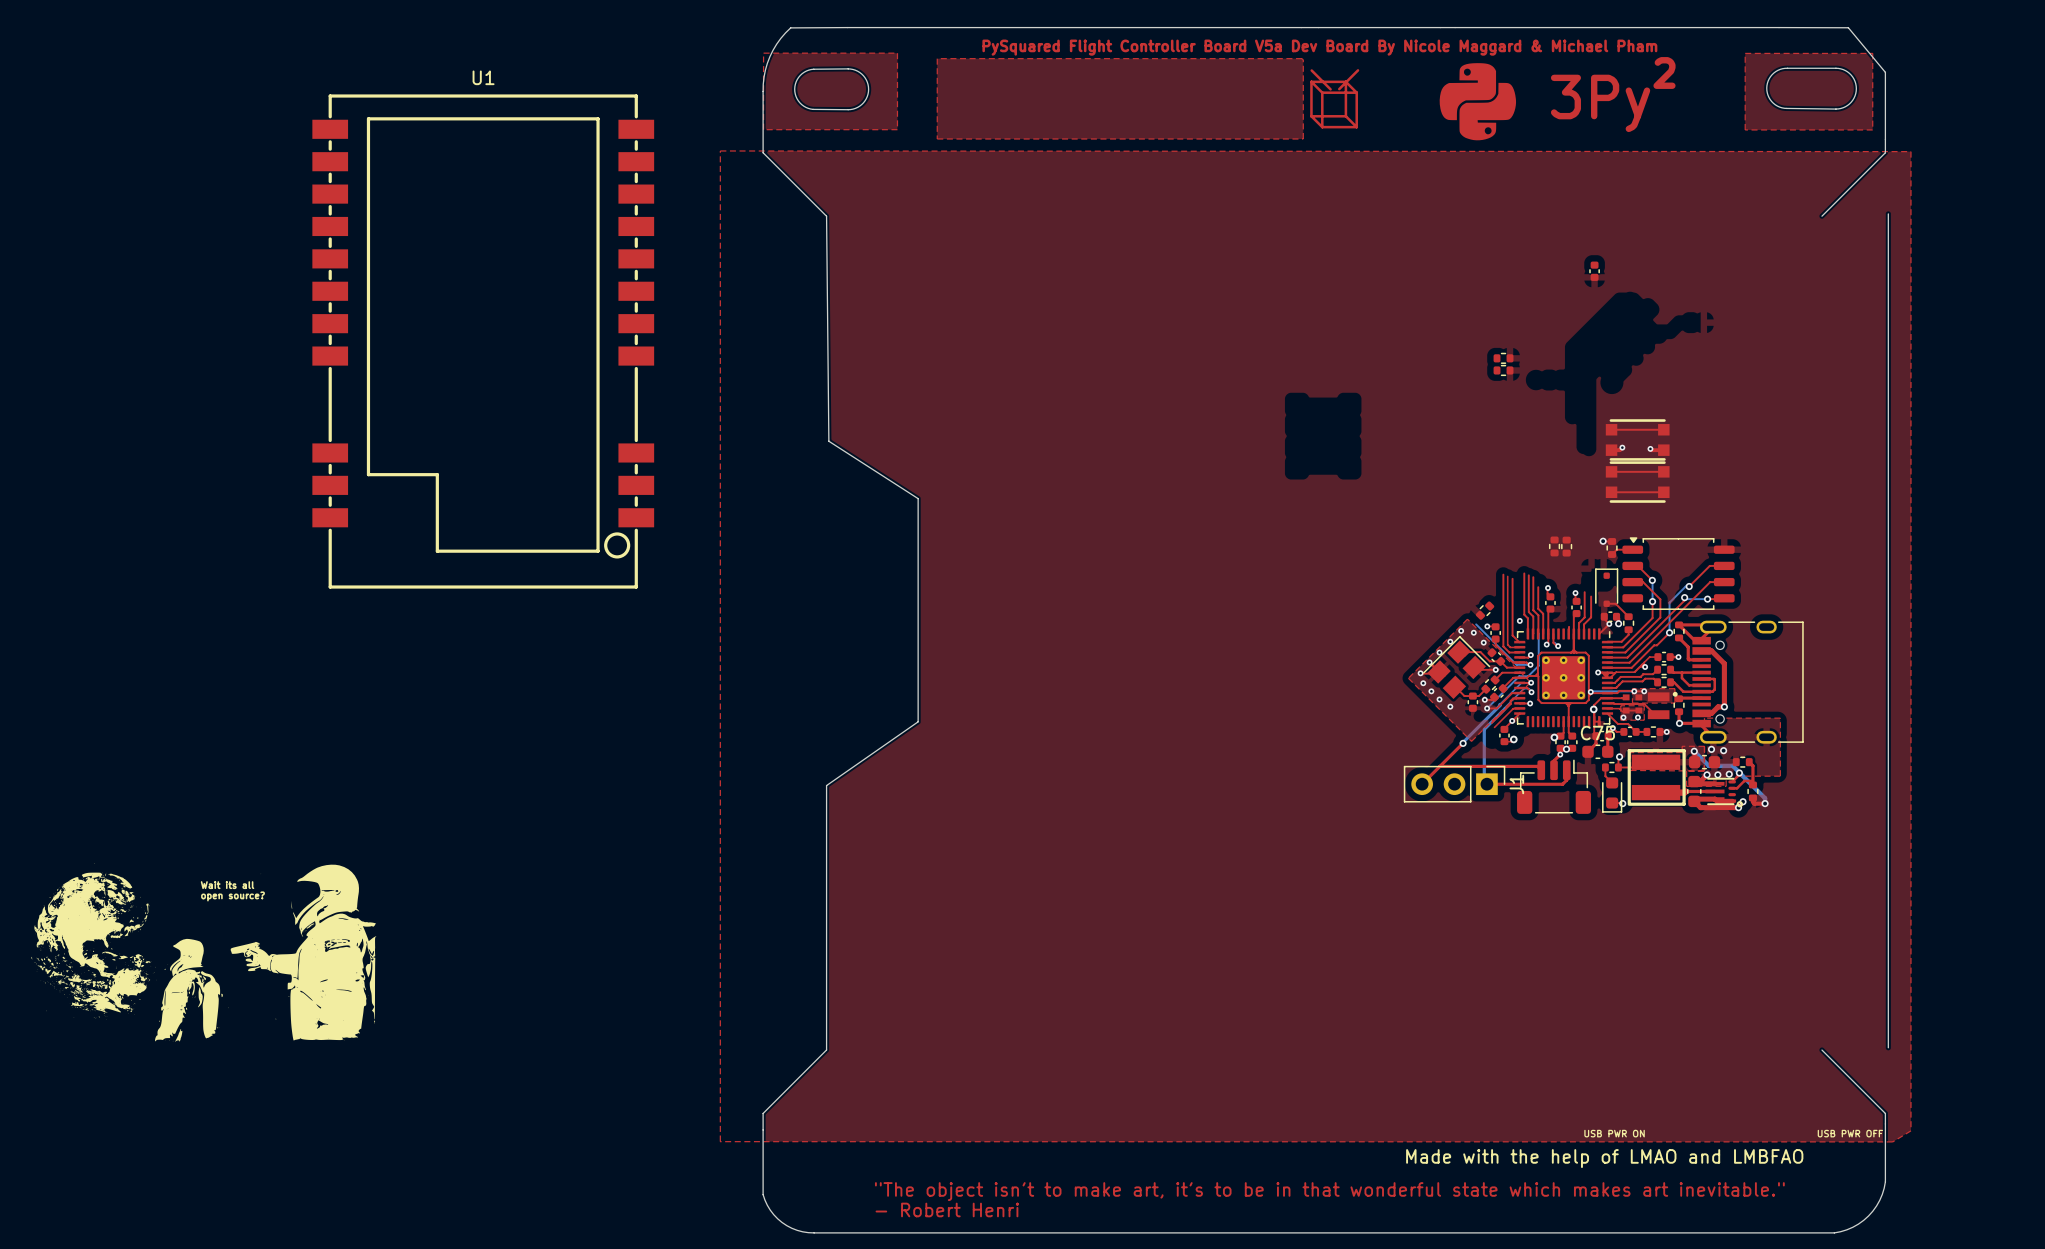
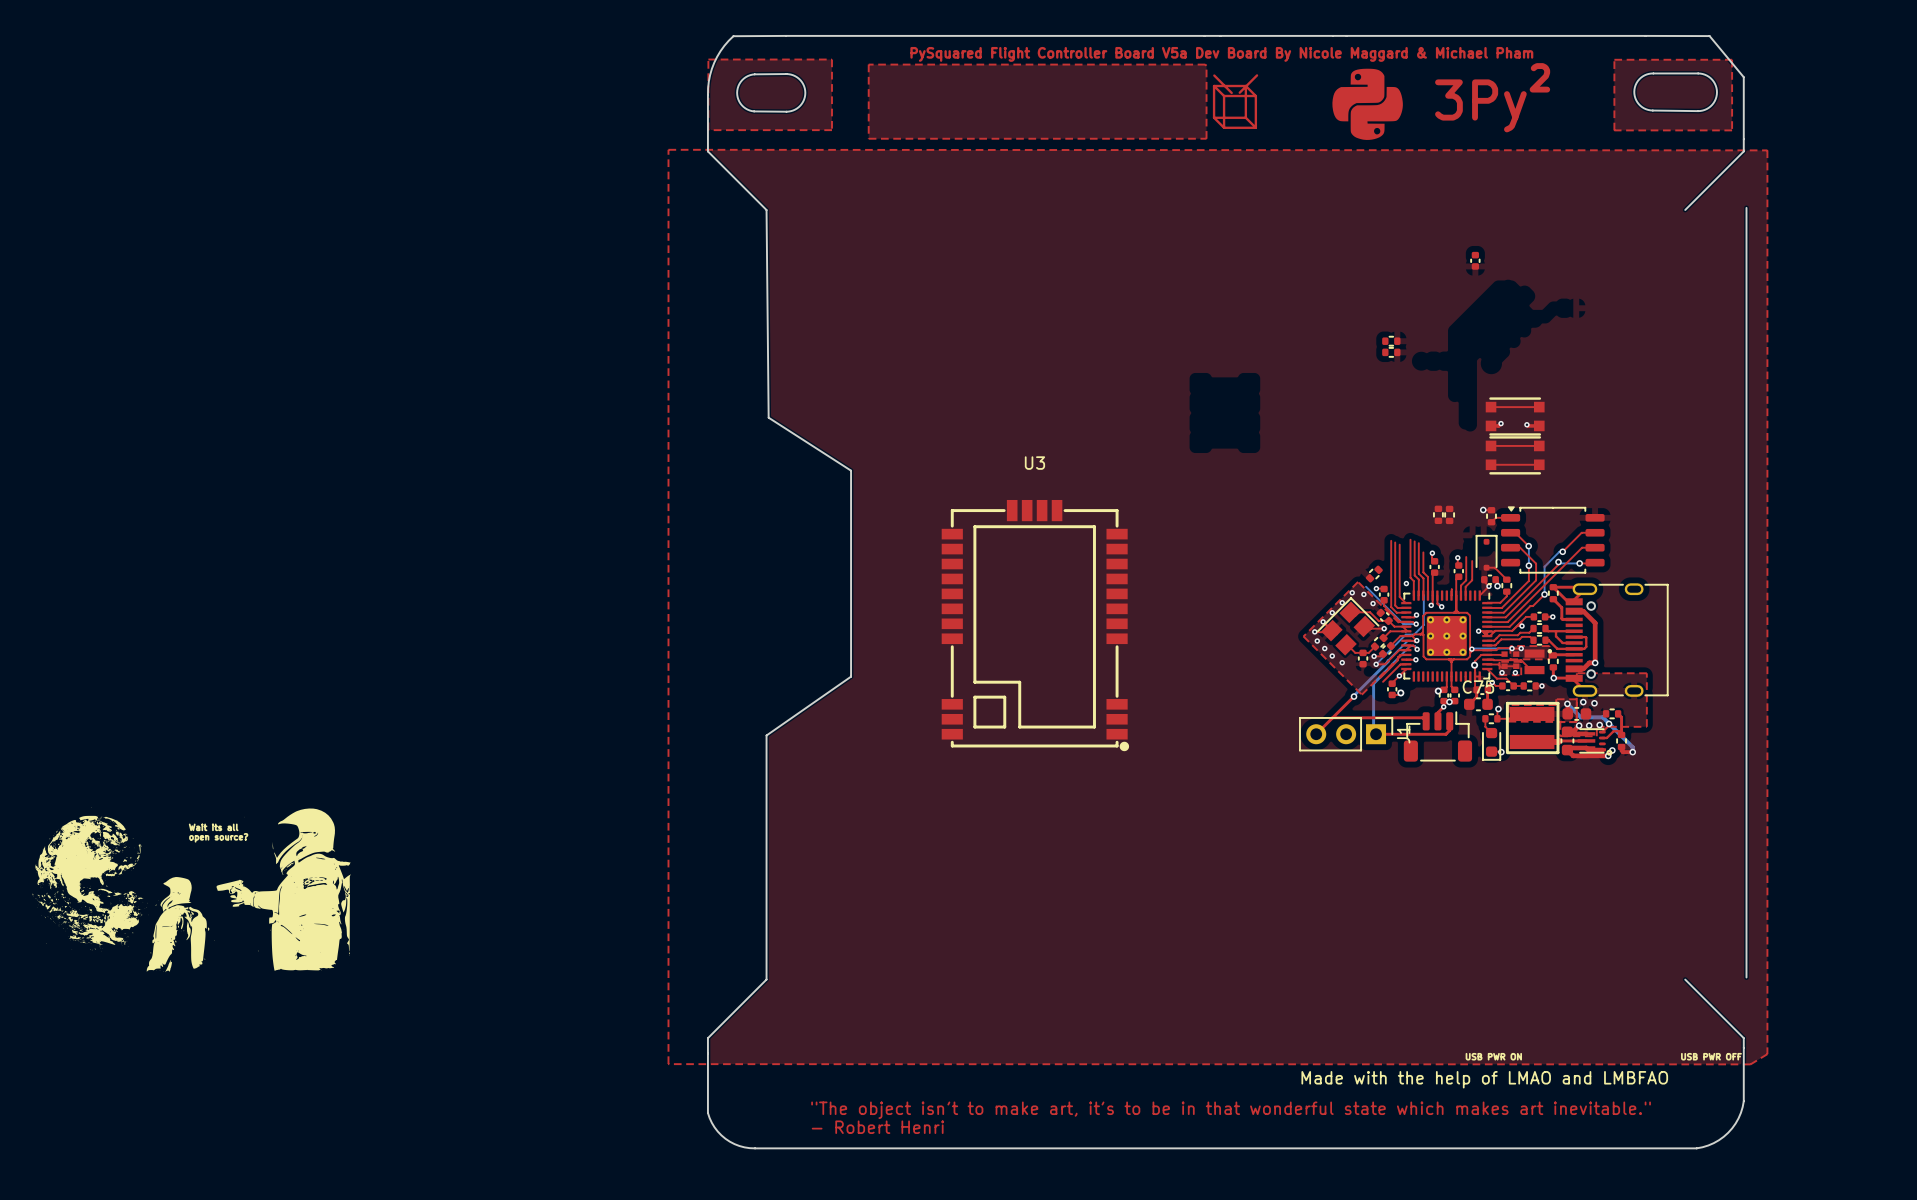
U1: (483, 341) -> none
U3: none -> (1035, 625)

